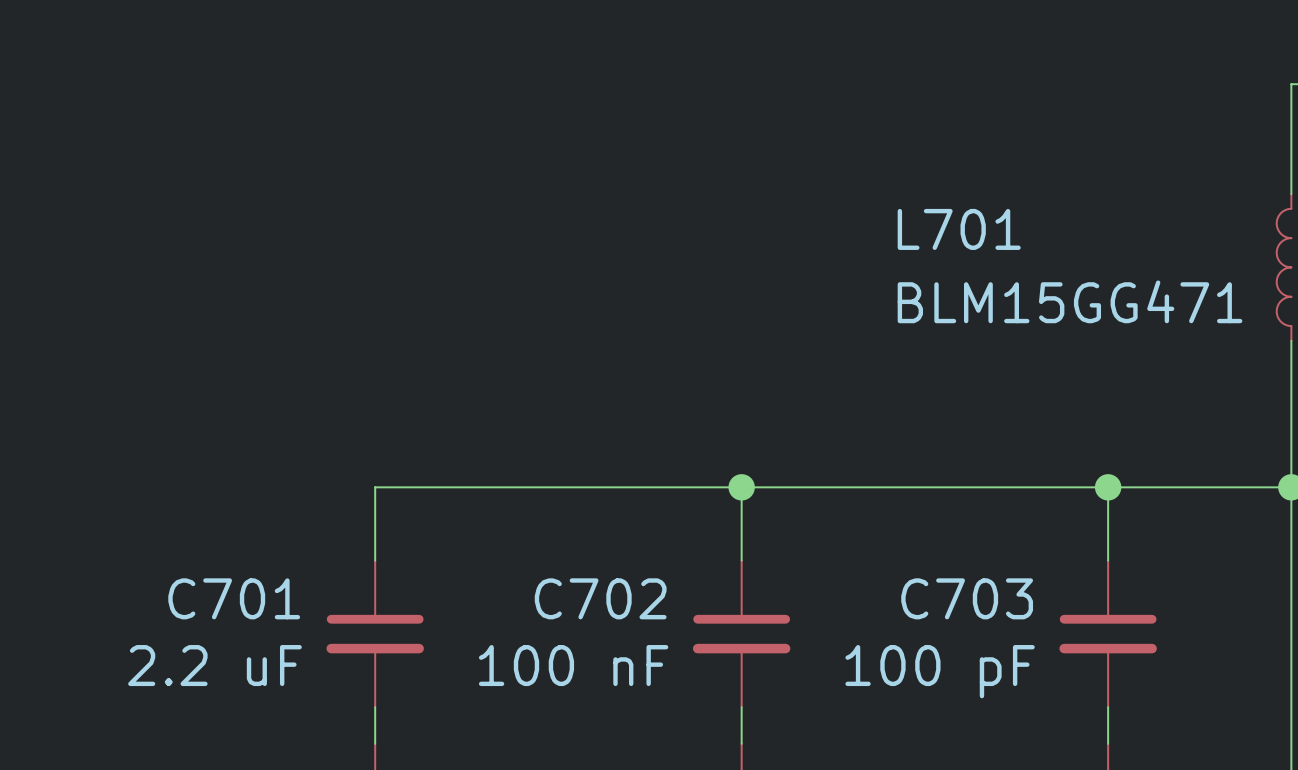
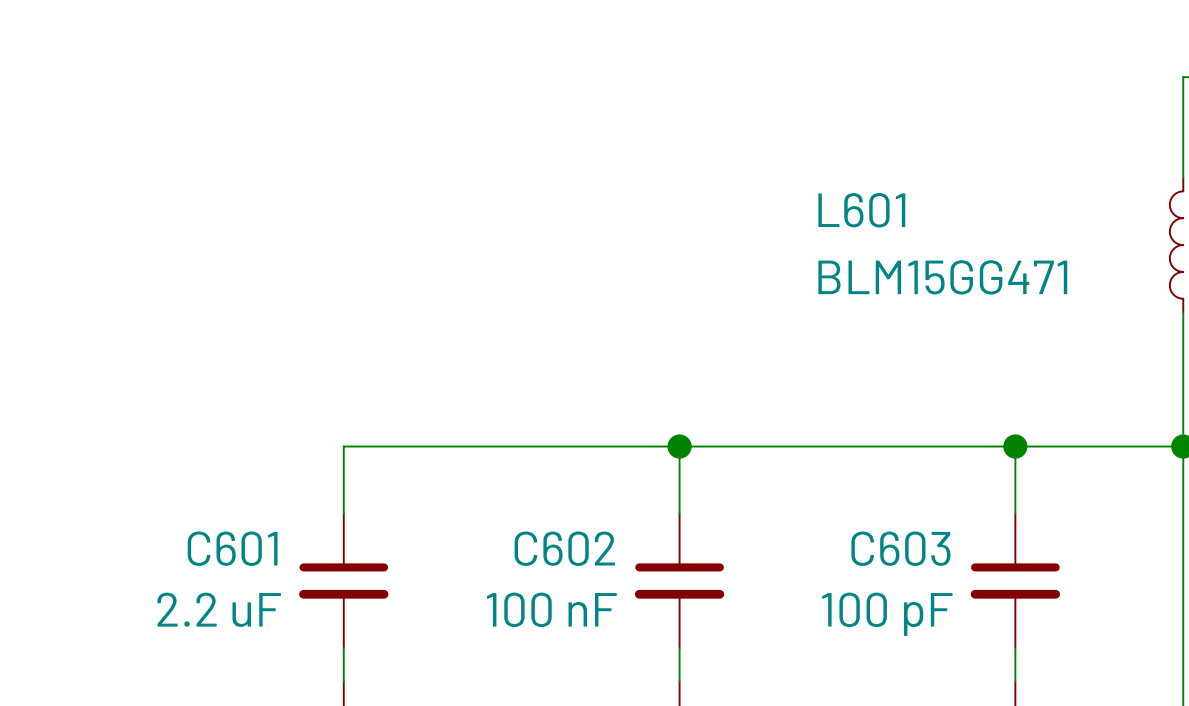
L701 name: L701 (959, 229) -> L601 (861, 210)
C701 name: C701 (234, 598) -> C601 (232, 548)
C702 name: C702 (600, 598) -> C602 (564, 548)
C703 name: C703 (967, 598) -> C603 (900, 548)

